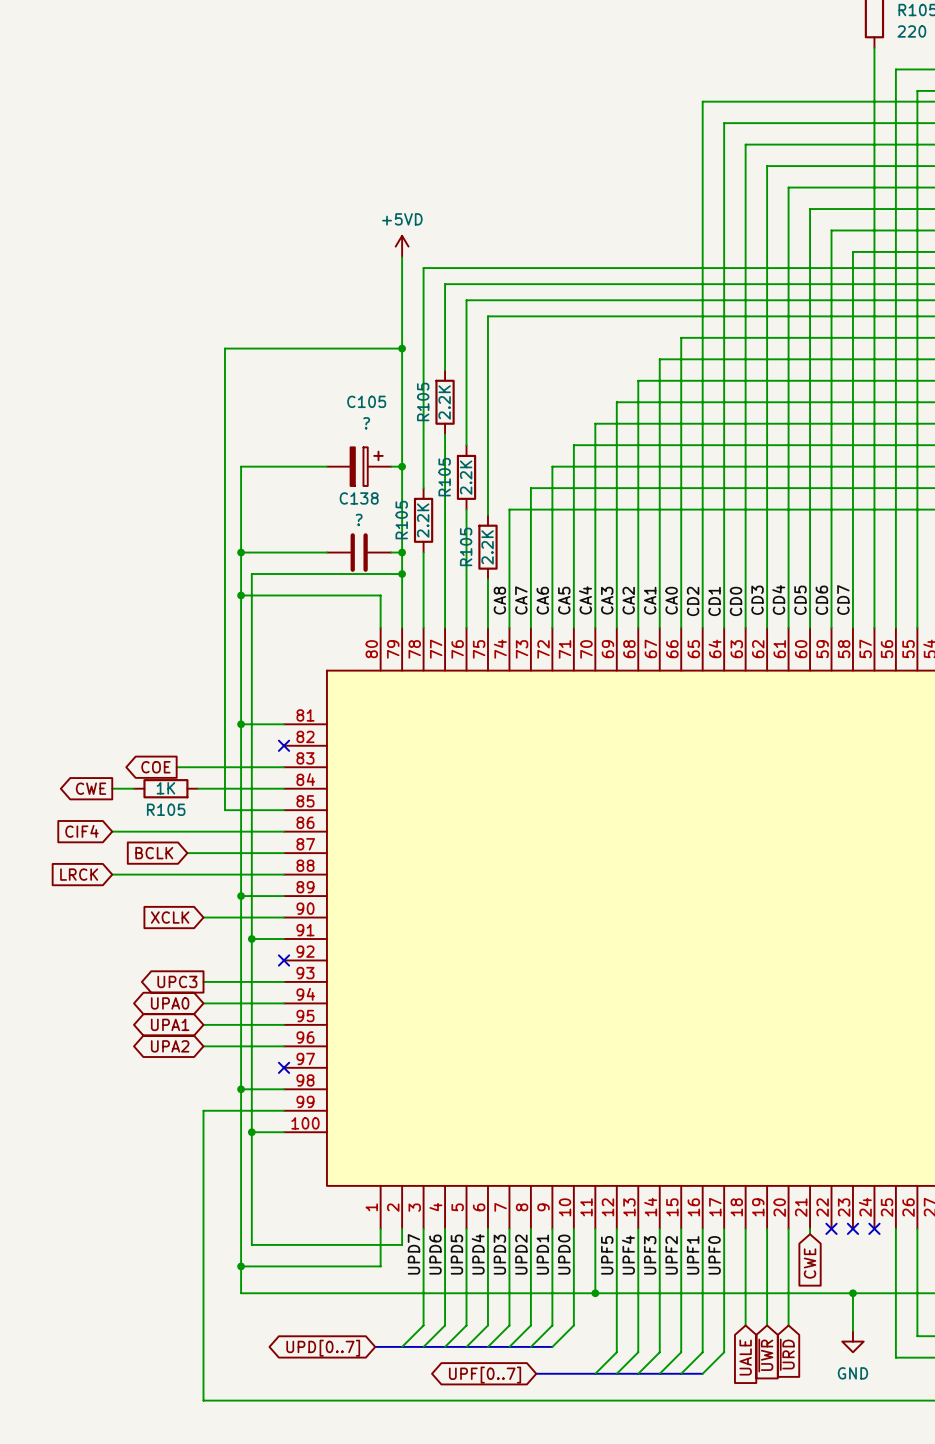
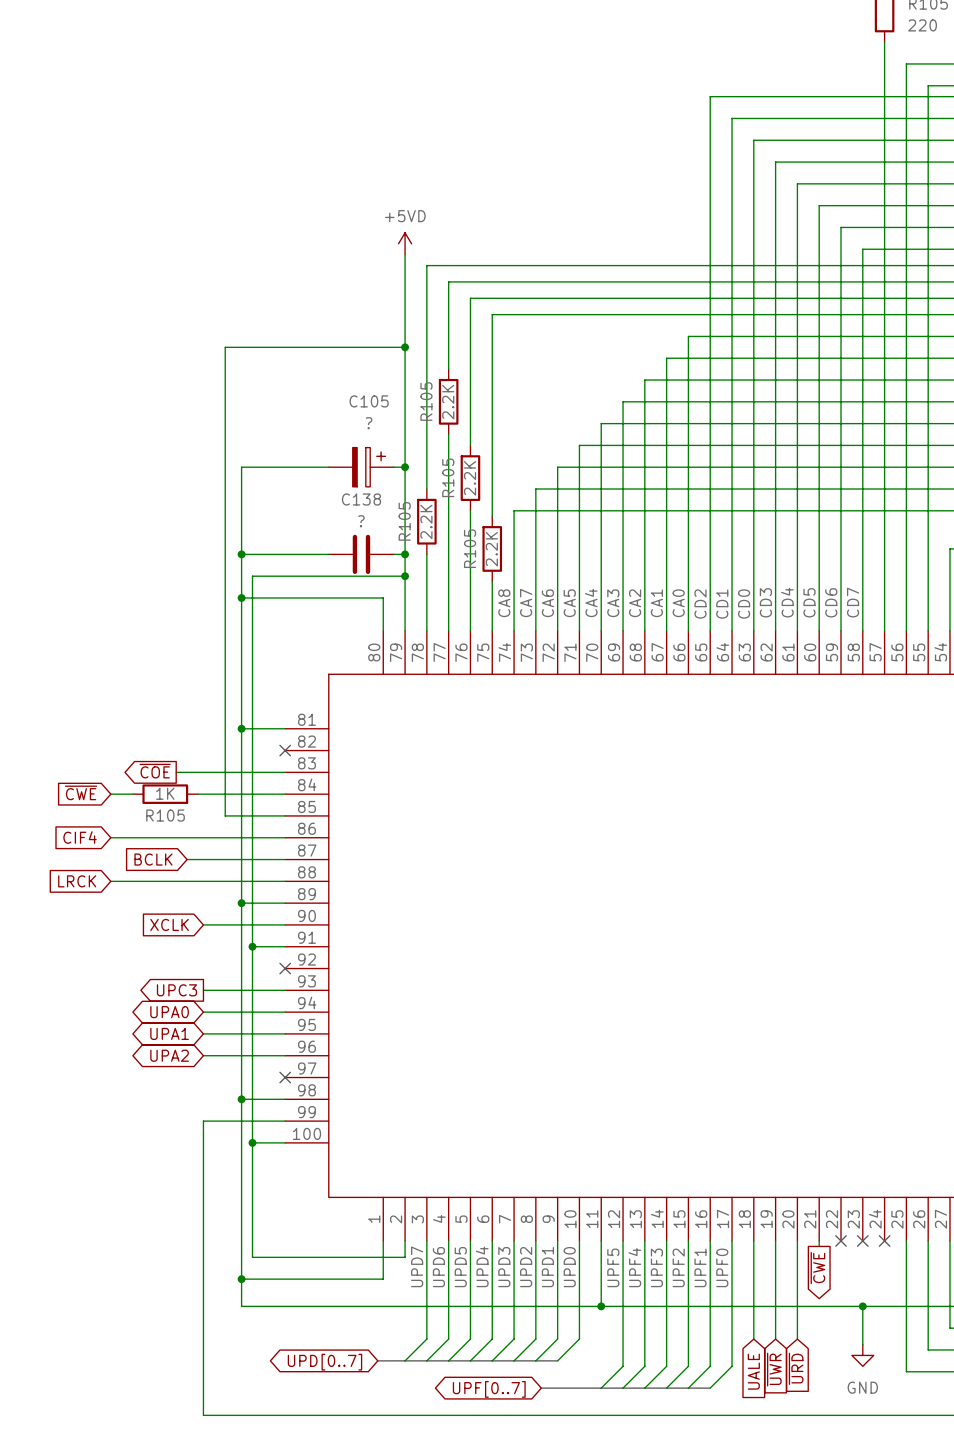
global label: COE (155, 767) -> ~{COE} (155, 771)
global label shape: output (91, 788) -> input (81, 792)
global label: CWE (91, 788) -> ~{CWE} (81, 792)
global label shape: input (810, 1263) -> output (817, 1267)
global label: CWE (810, 1263) -> ~{CWE} (817, 1267)

